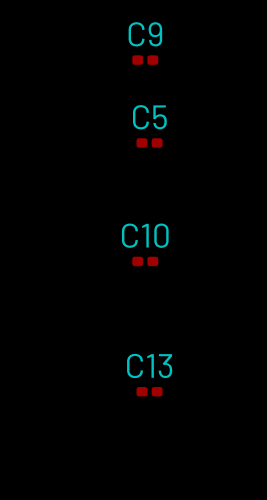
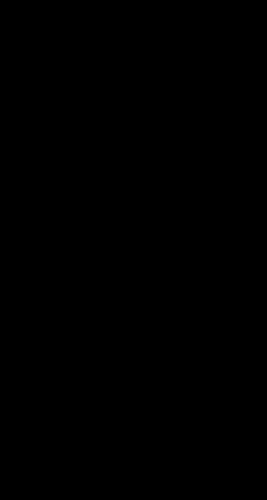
C9: (145, 60) -> none
C5: (149, 142) -> none
C10: (145, 261) -> none
C13: (149, 391) -> none

